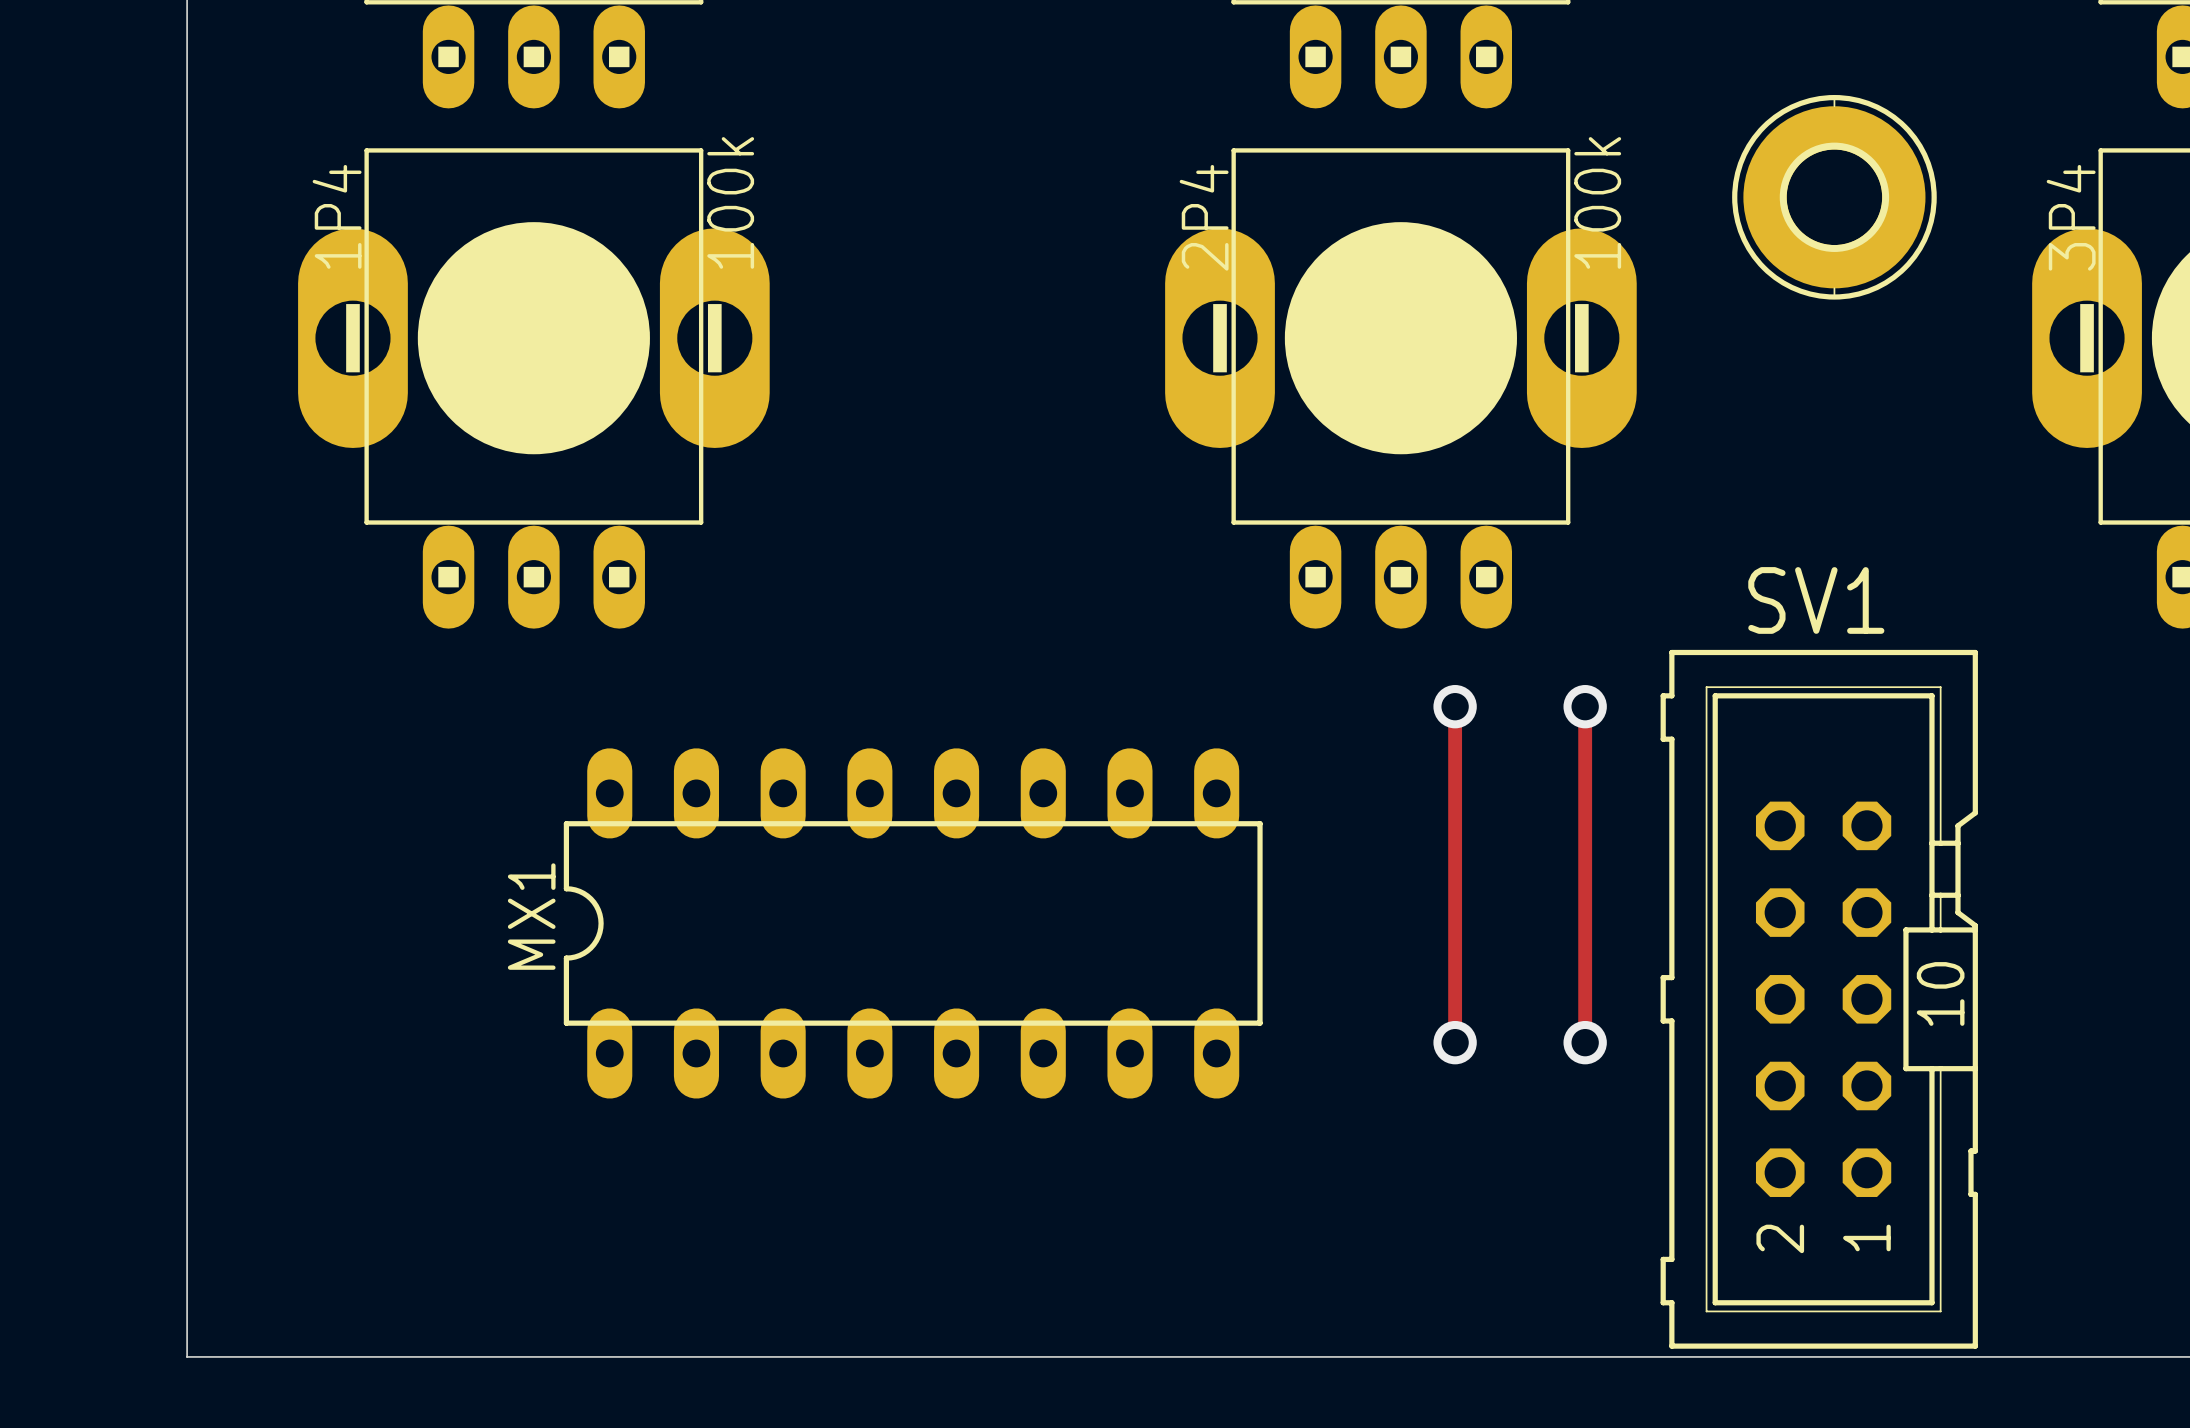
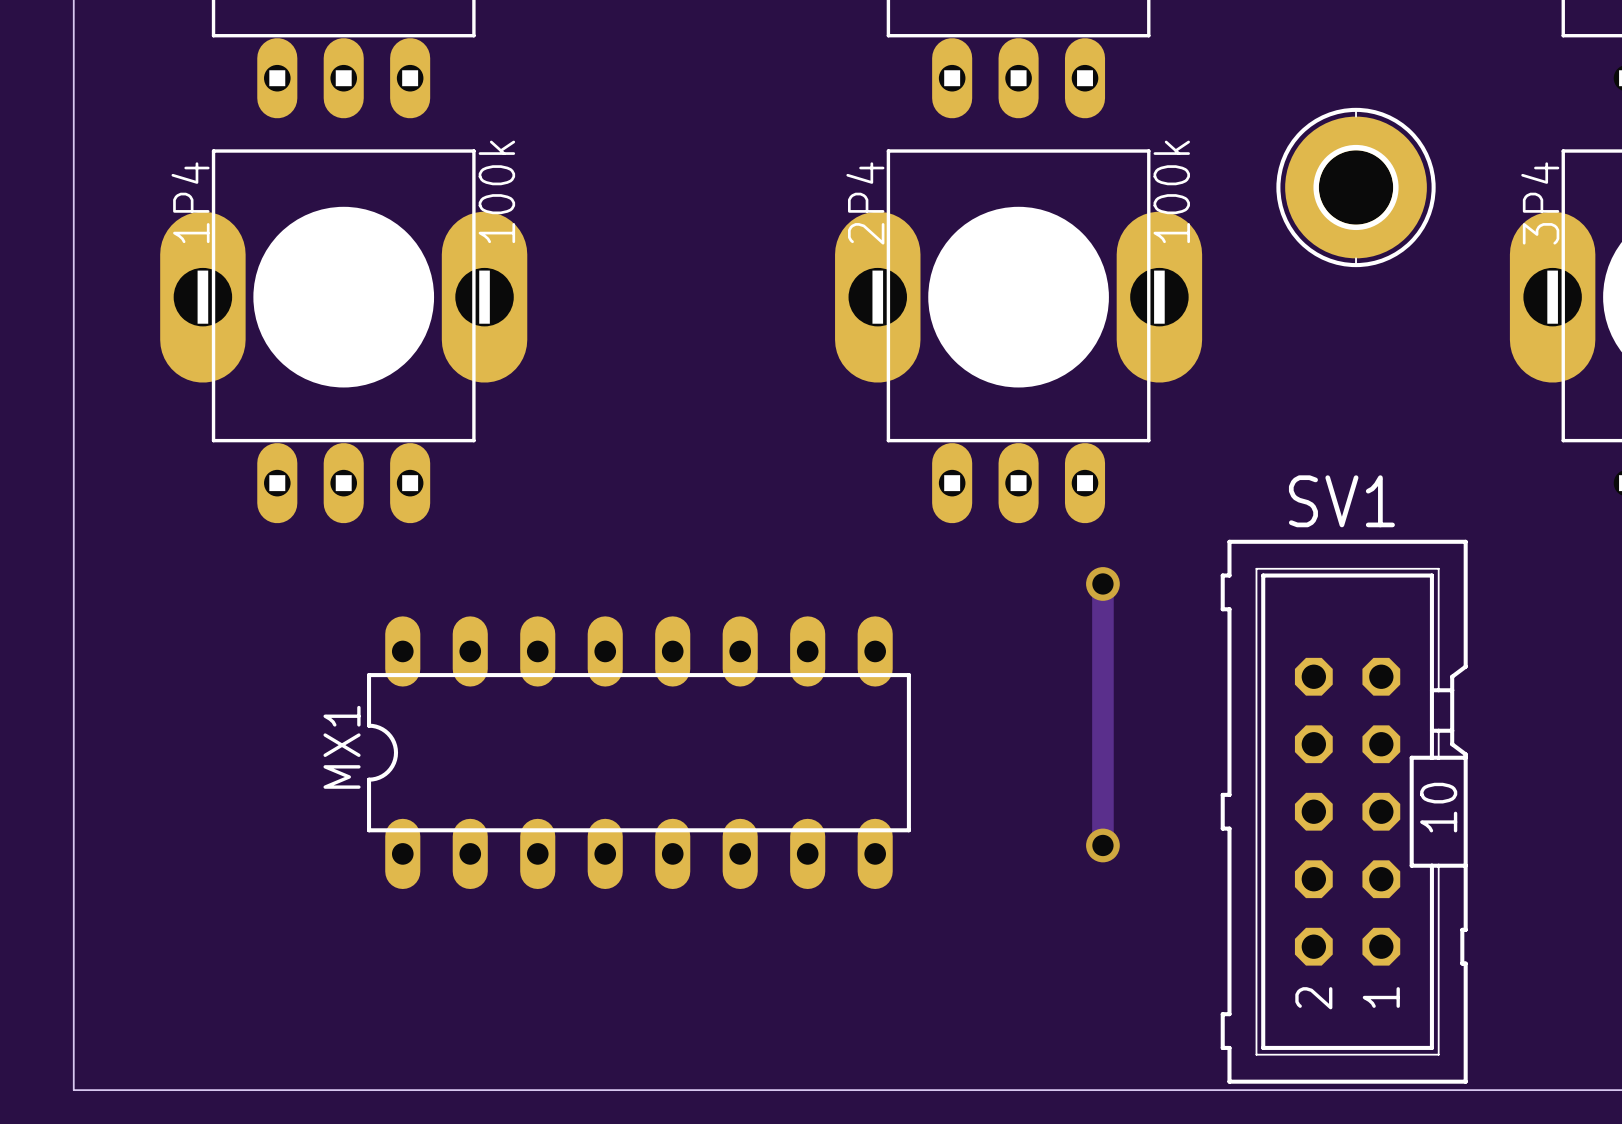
track: (1455, 706) (1455, 1042) -> (1102, 583) (1102, 845)
via: (1455, 706) -> none
via: none -> (1102, 583)
track: (1585, 706) (1585, 1042) -> none
via: (1585, 706) -> none
via: (1455, 1042) -> none
via: none -> (1102, 845)
via: (1585, 1042) -> none

